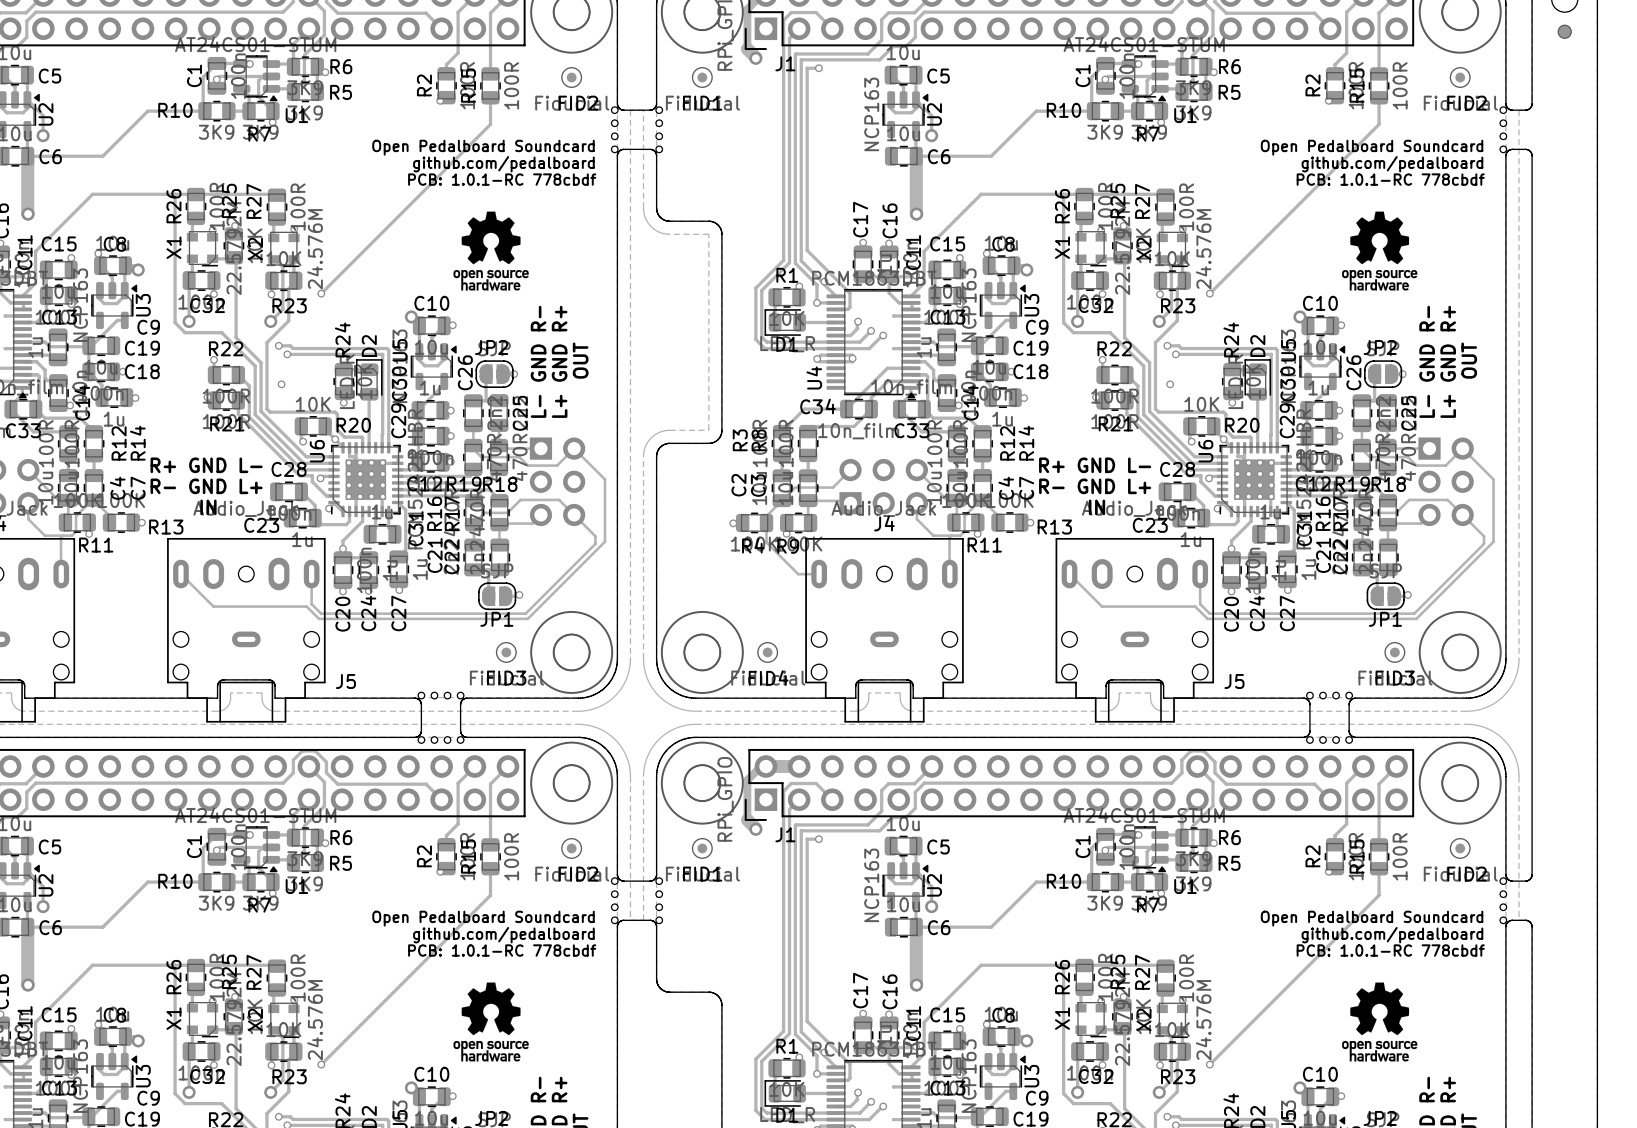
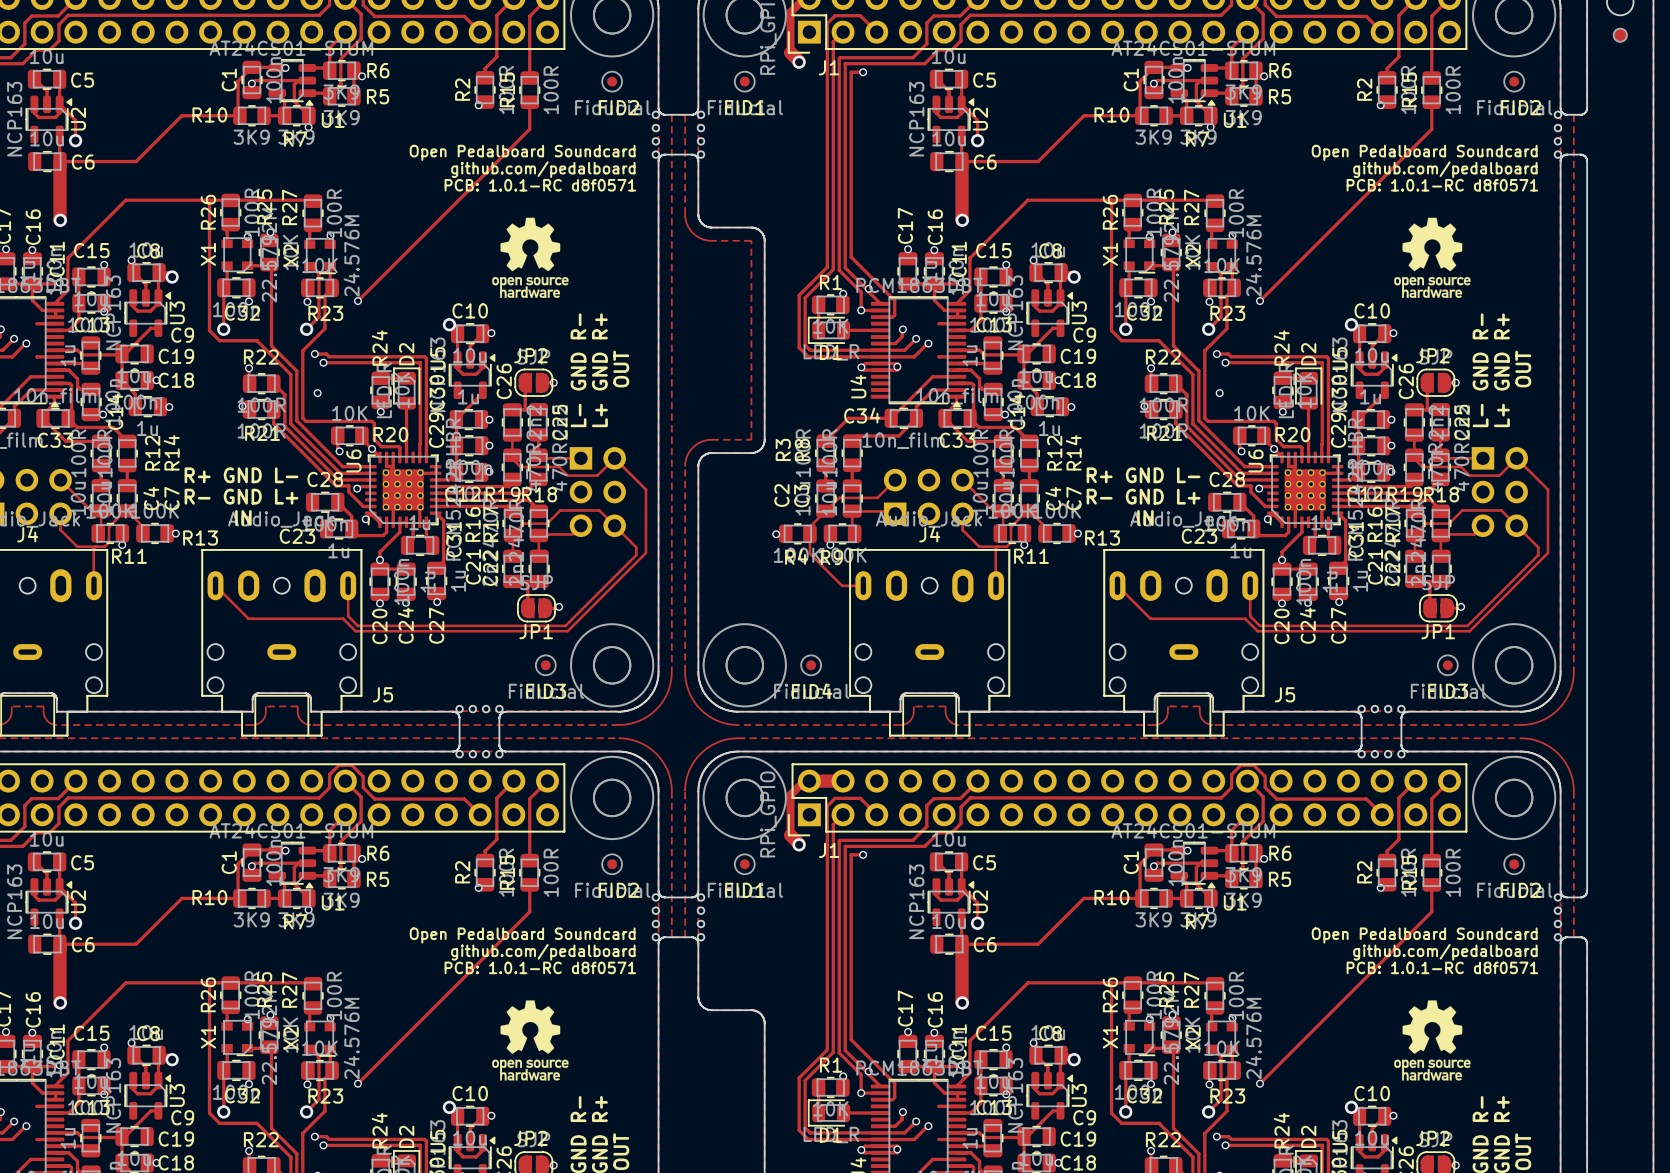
text: PCB: 1.0.1-RC 778cbdf (502, 179) -> PCB: 1.0.1-RC d8f0571 (540, 185)
text: PCB: 1.0.1-RC 778cbdf (1390, 179) -> PCB: 1.0.1-RC d8f0571 (1442, 185)
text: PCB: 1.0.1-RC 778cbdf (502, 950) -> PCB: 1.0.1-RC d8f0571 (540, 967)
text: PCB: 1.0.1-RC 778cbdf (1390, 950) -> PCB: 1.0.1-RC d8f0571 (1442, 967)

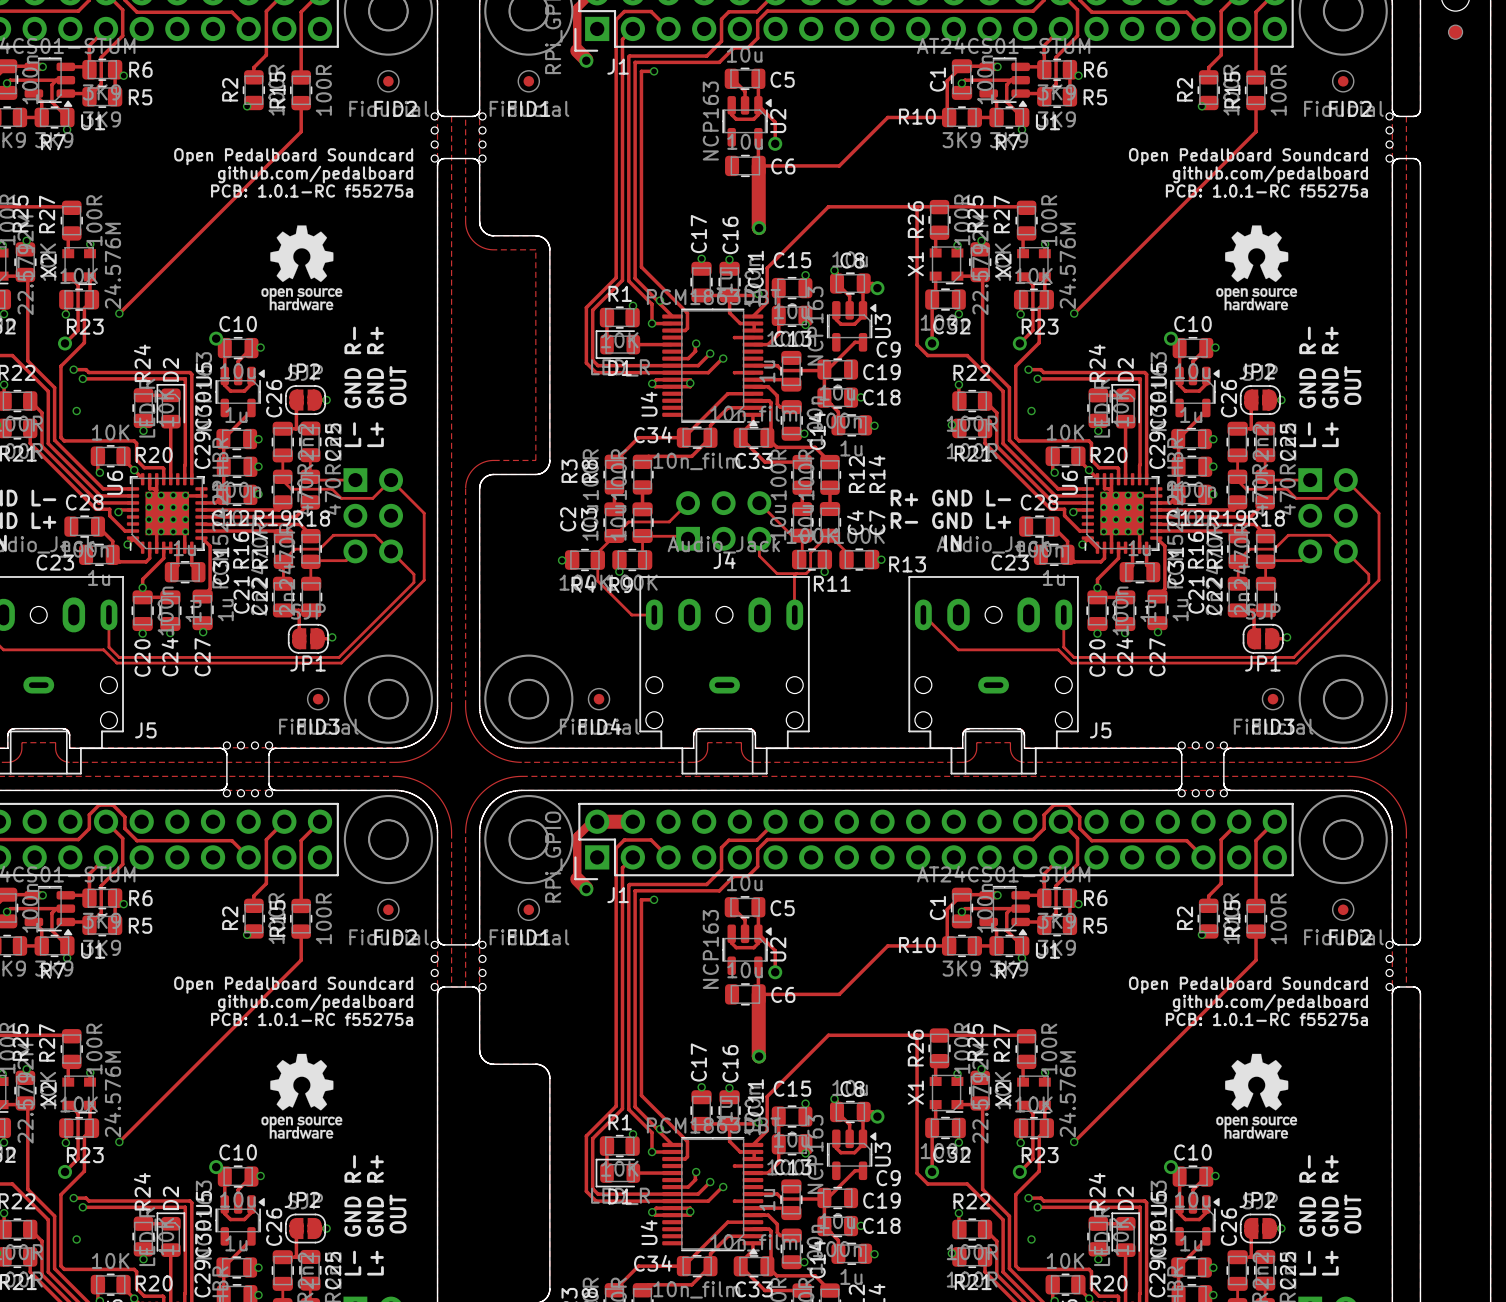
text: PCB: 1.0.1-RC d8f0571 (540, 185) -> PCB: 1.0.1-RC f55275a (312, 191)
text: PCB: 1.0.1-RC d8f0571 (1442, 185) -> PCB: 1.0.1-RC f55275a (1266, 191)
text: PCB: 1.0.1-RC d8f0571 (540, 967) -> PCB: 1.0.1-RC f55275a (312, 1019)
text: PCB: 1.0.1-RC d8f0571 (1442, 967) -> PCB: 1.0.1-RC f55275a (1266, 1019)

